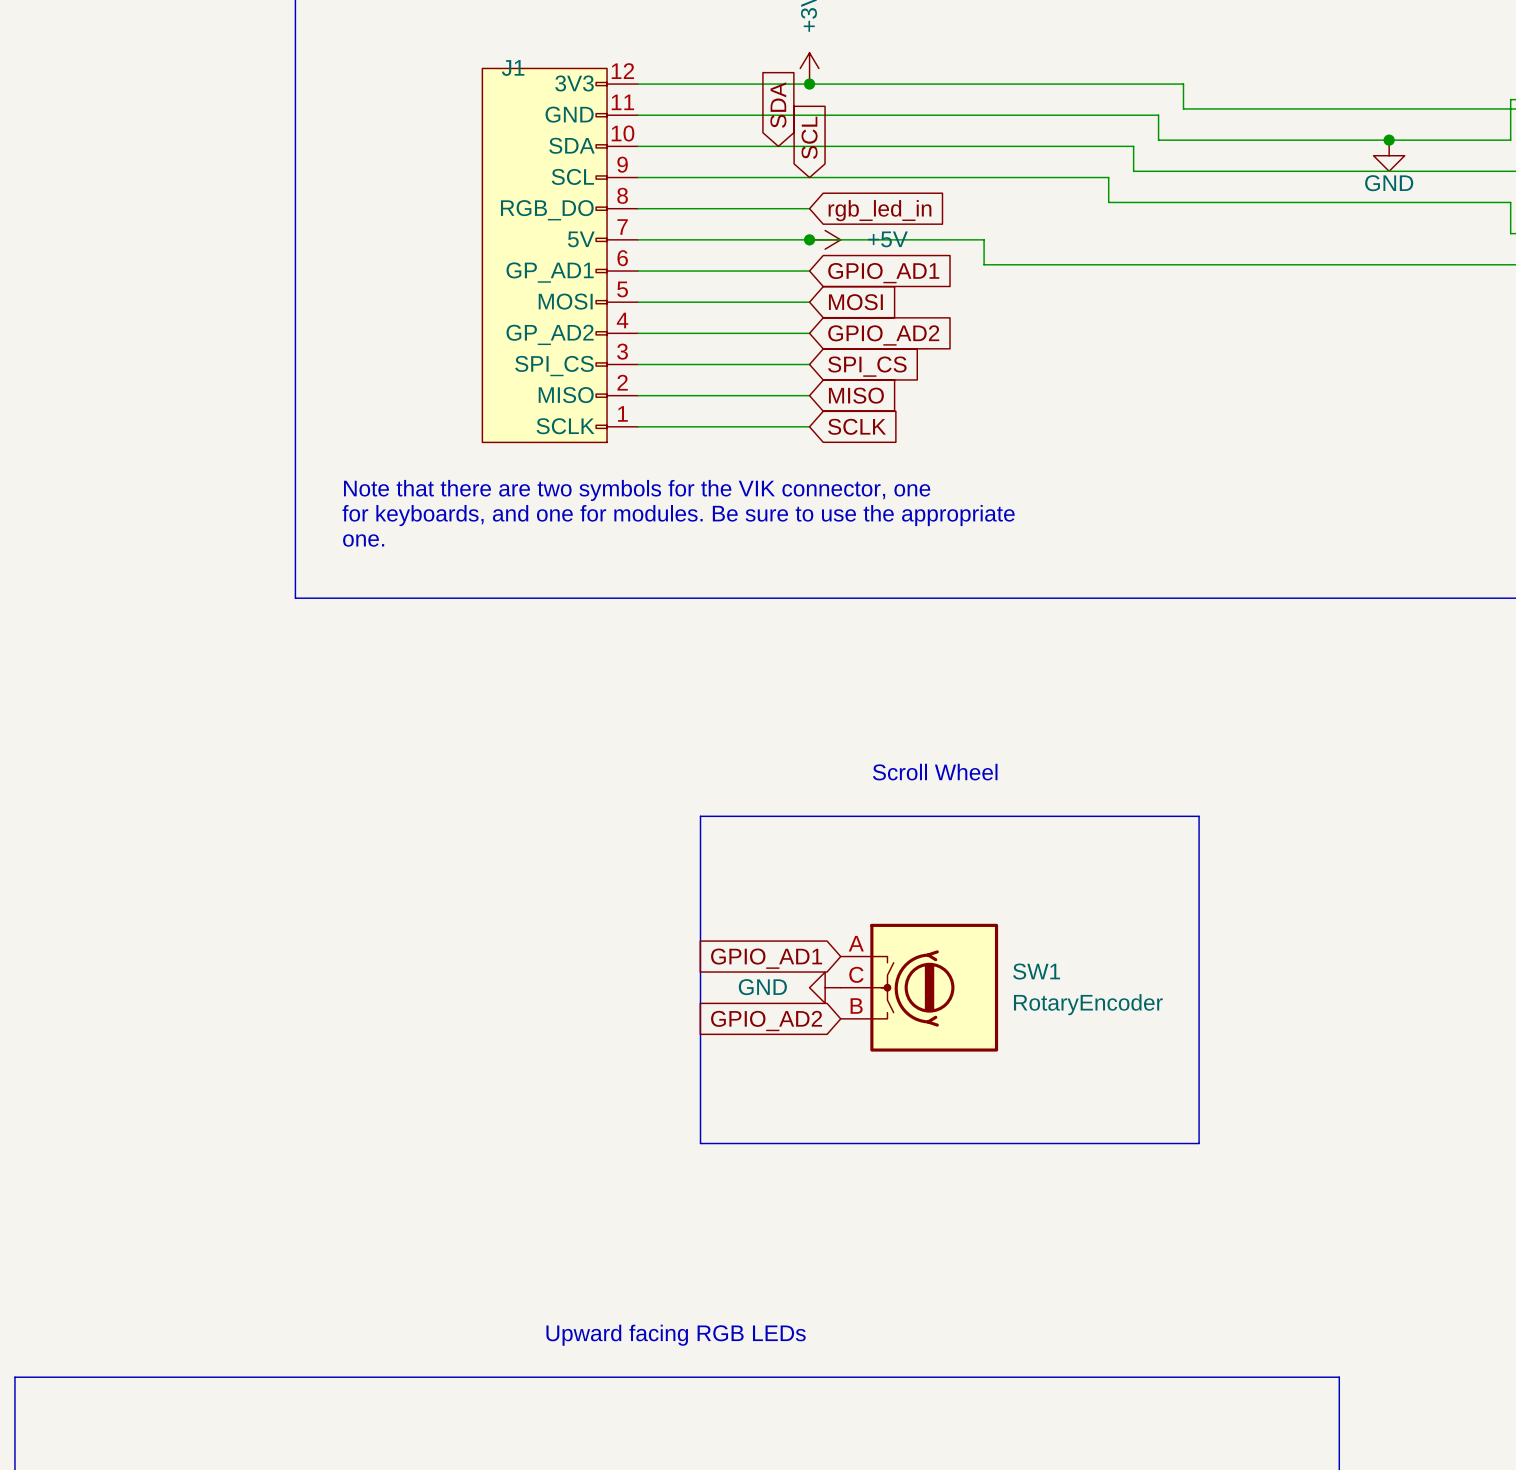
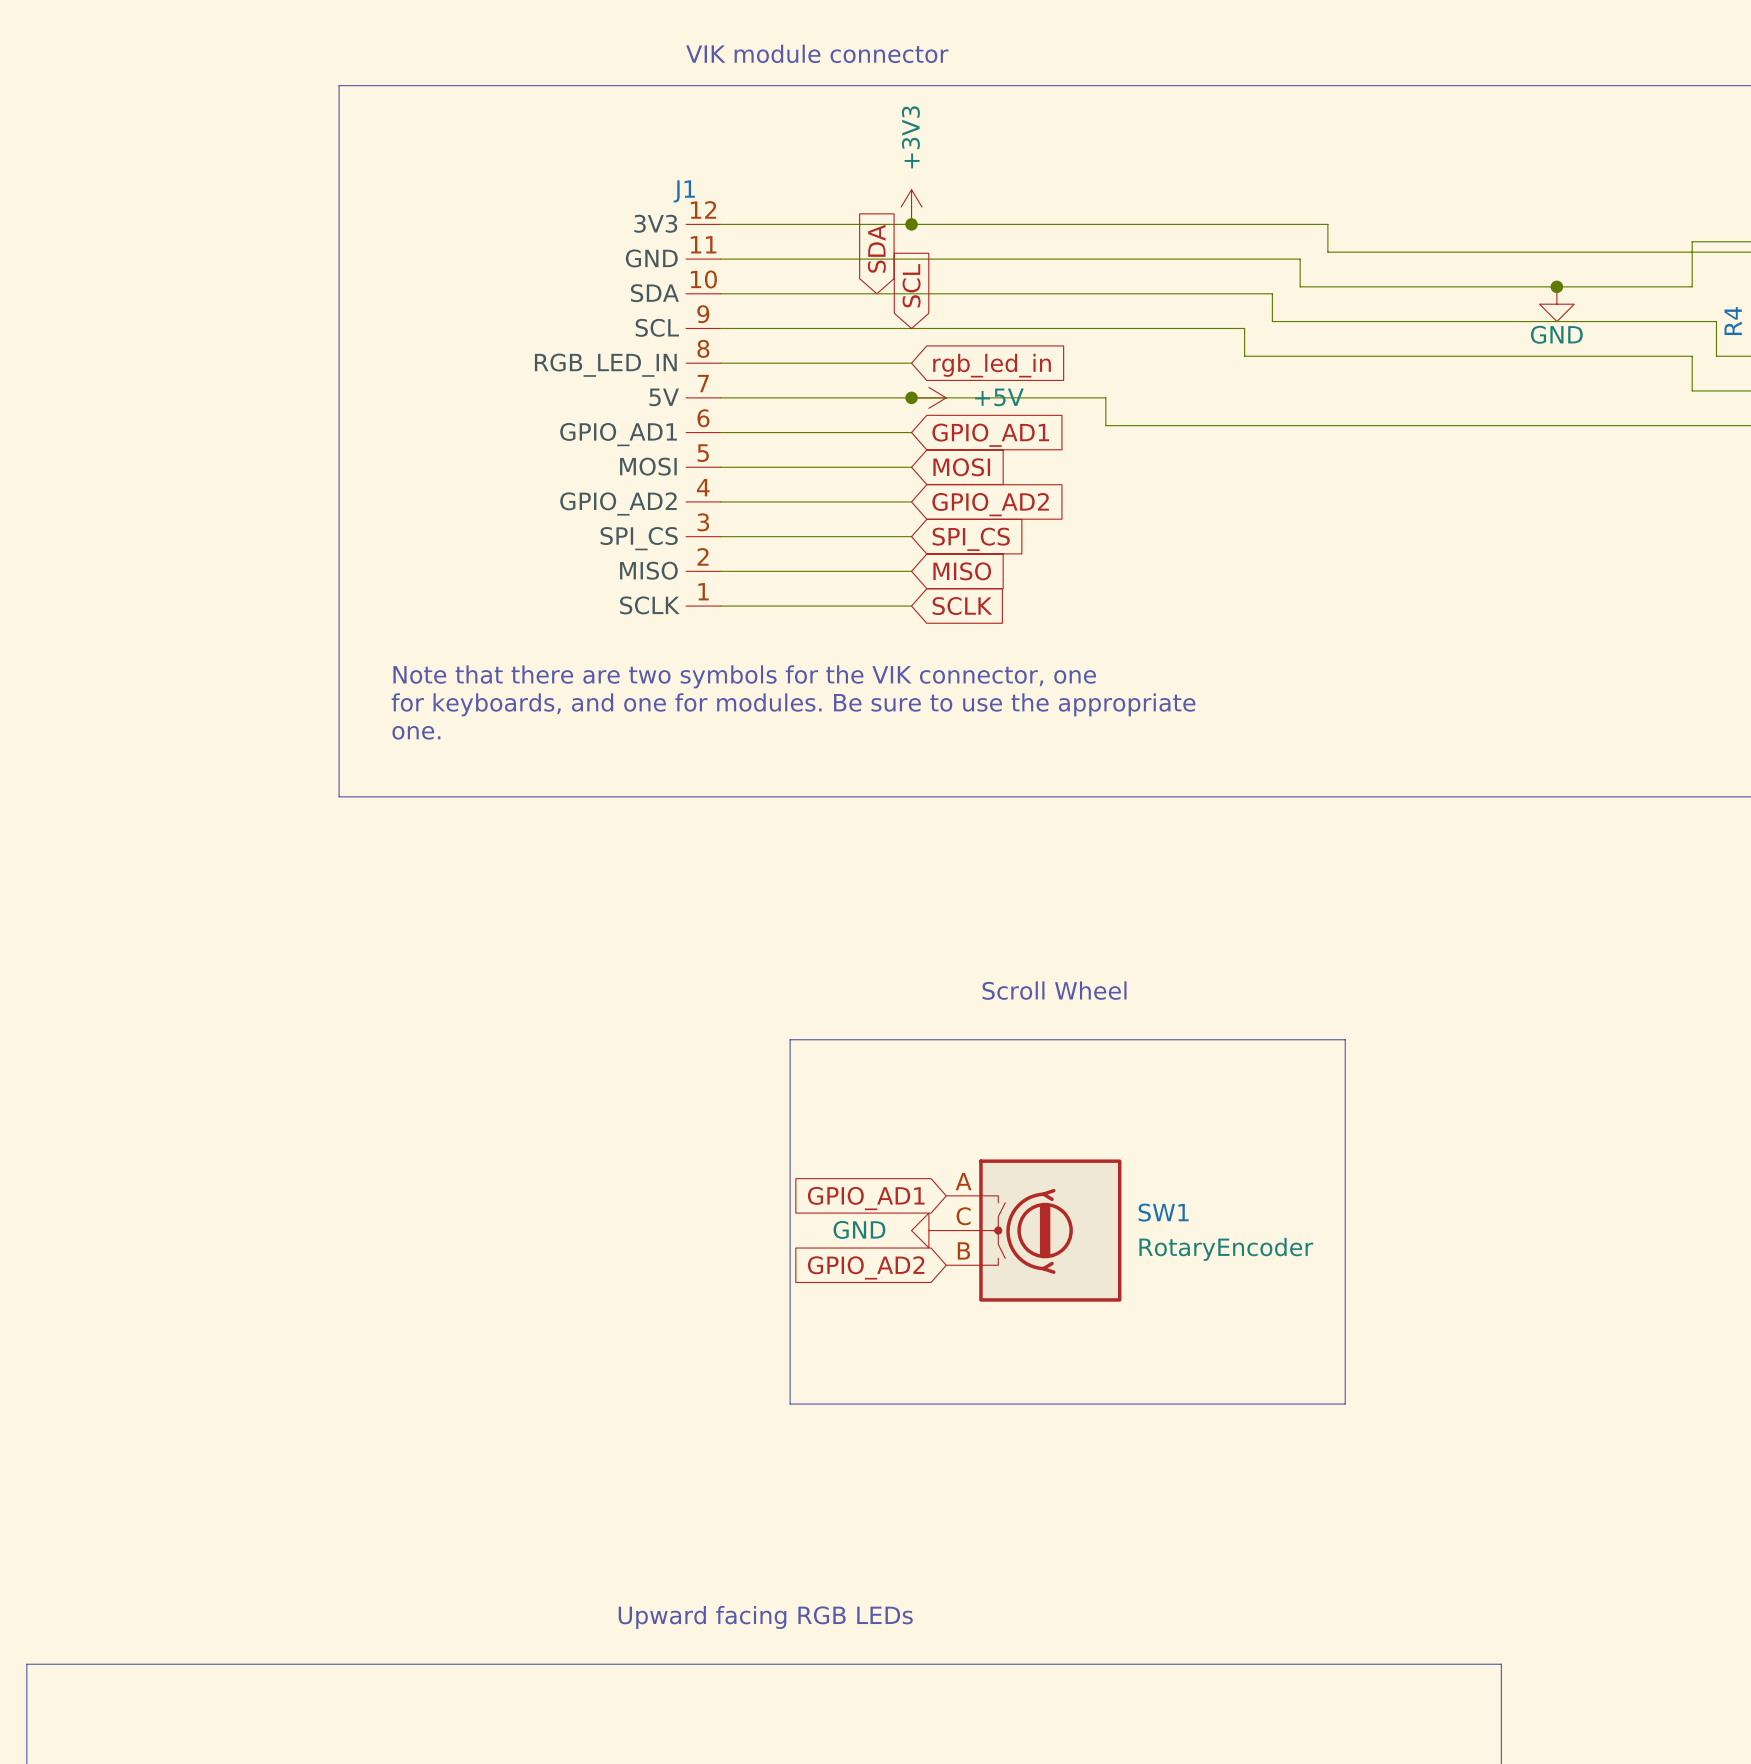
J1 symbol: [482, 68, 639, 443] -> [686, 224, 721, 607]
J1 name position: J1 (513, 68) -> J1 (684, 191)

